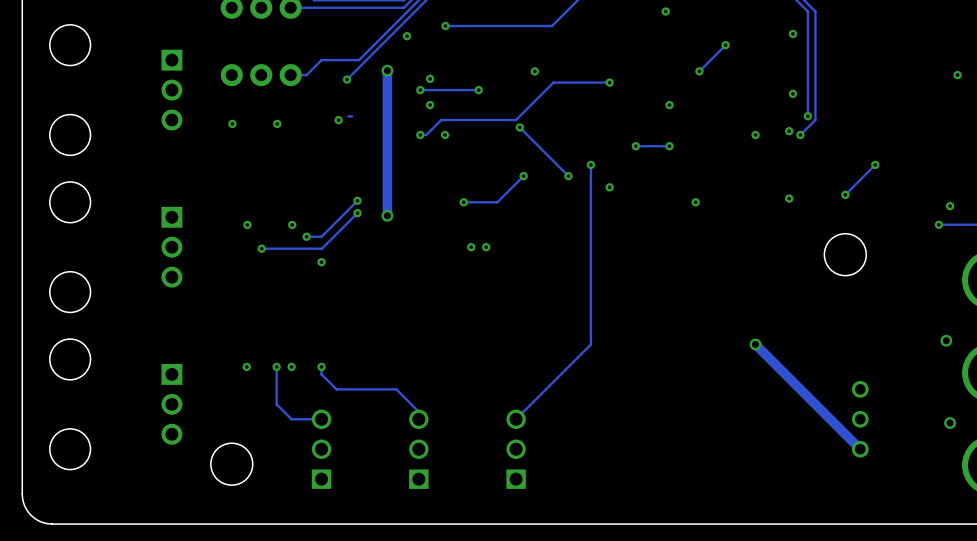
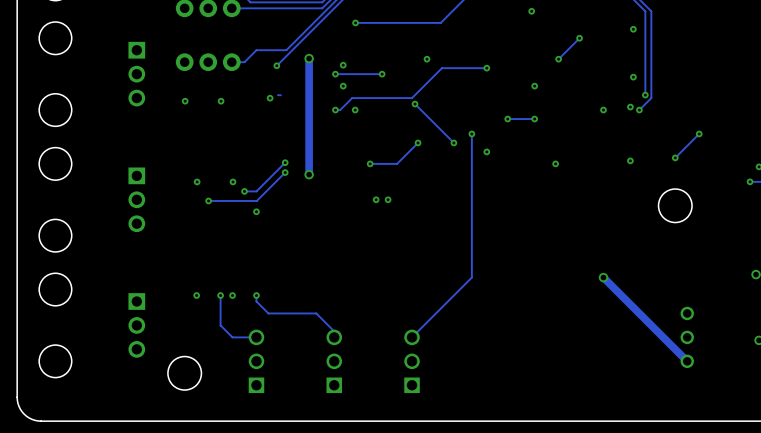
via: (407, 36) -> none

